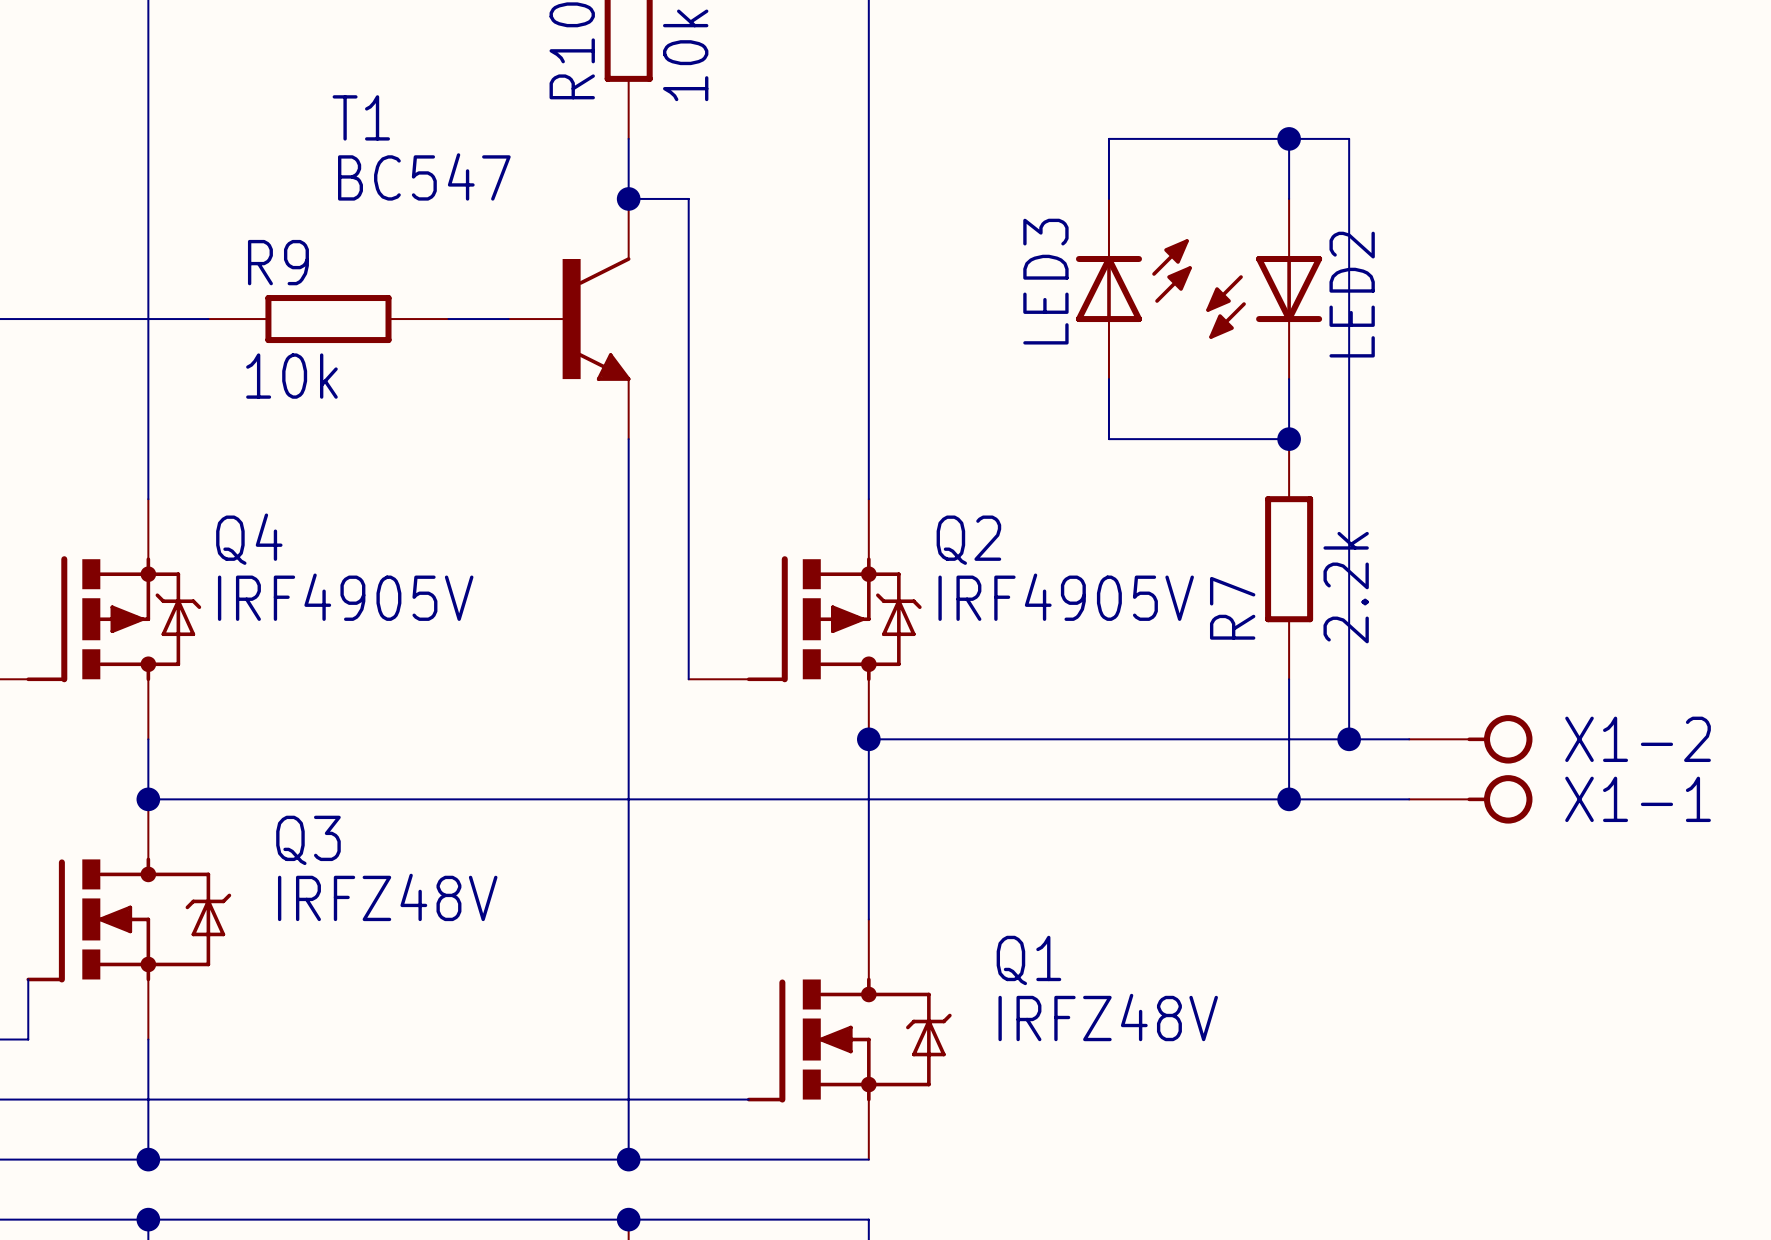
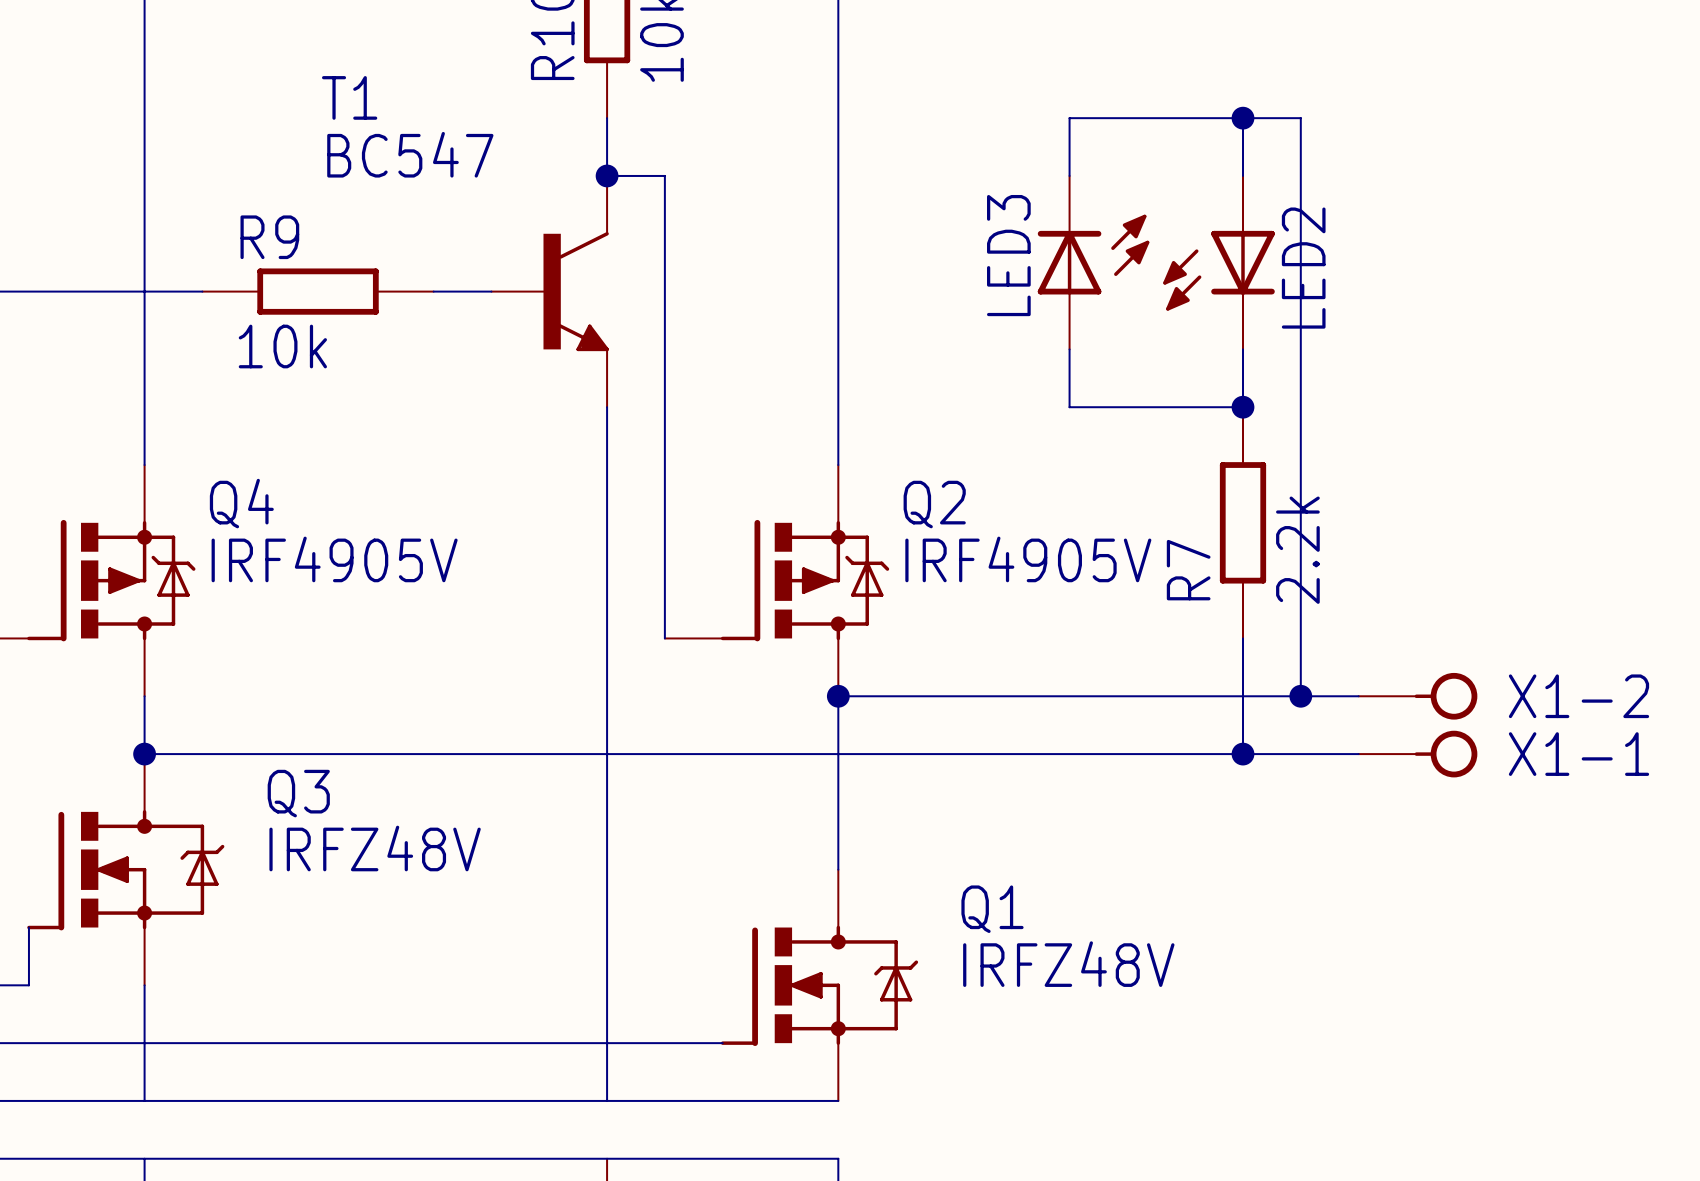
junction: (148, 1159) -> none
junction: (628, 1159) -> none
junction: (148, 1219) -> none
junction: (628, 1219) -> none

